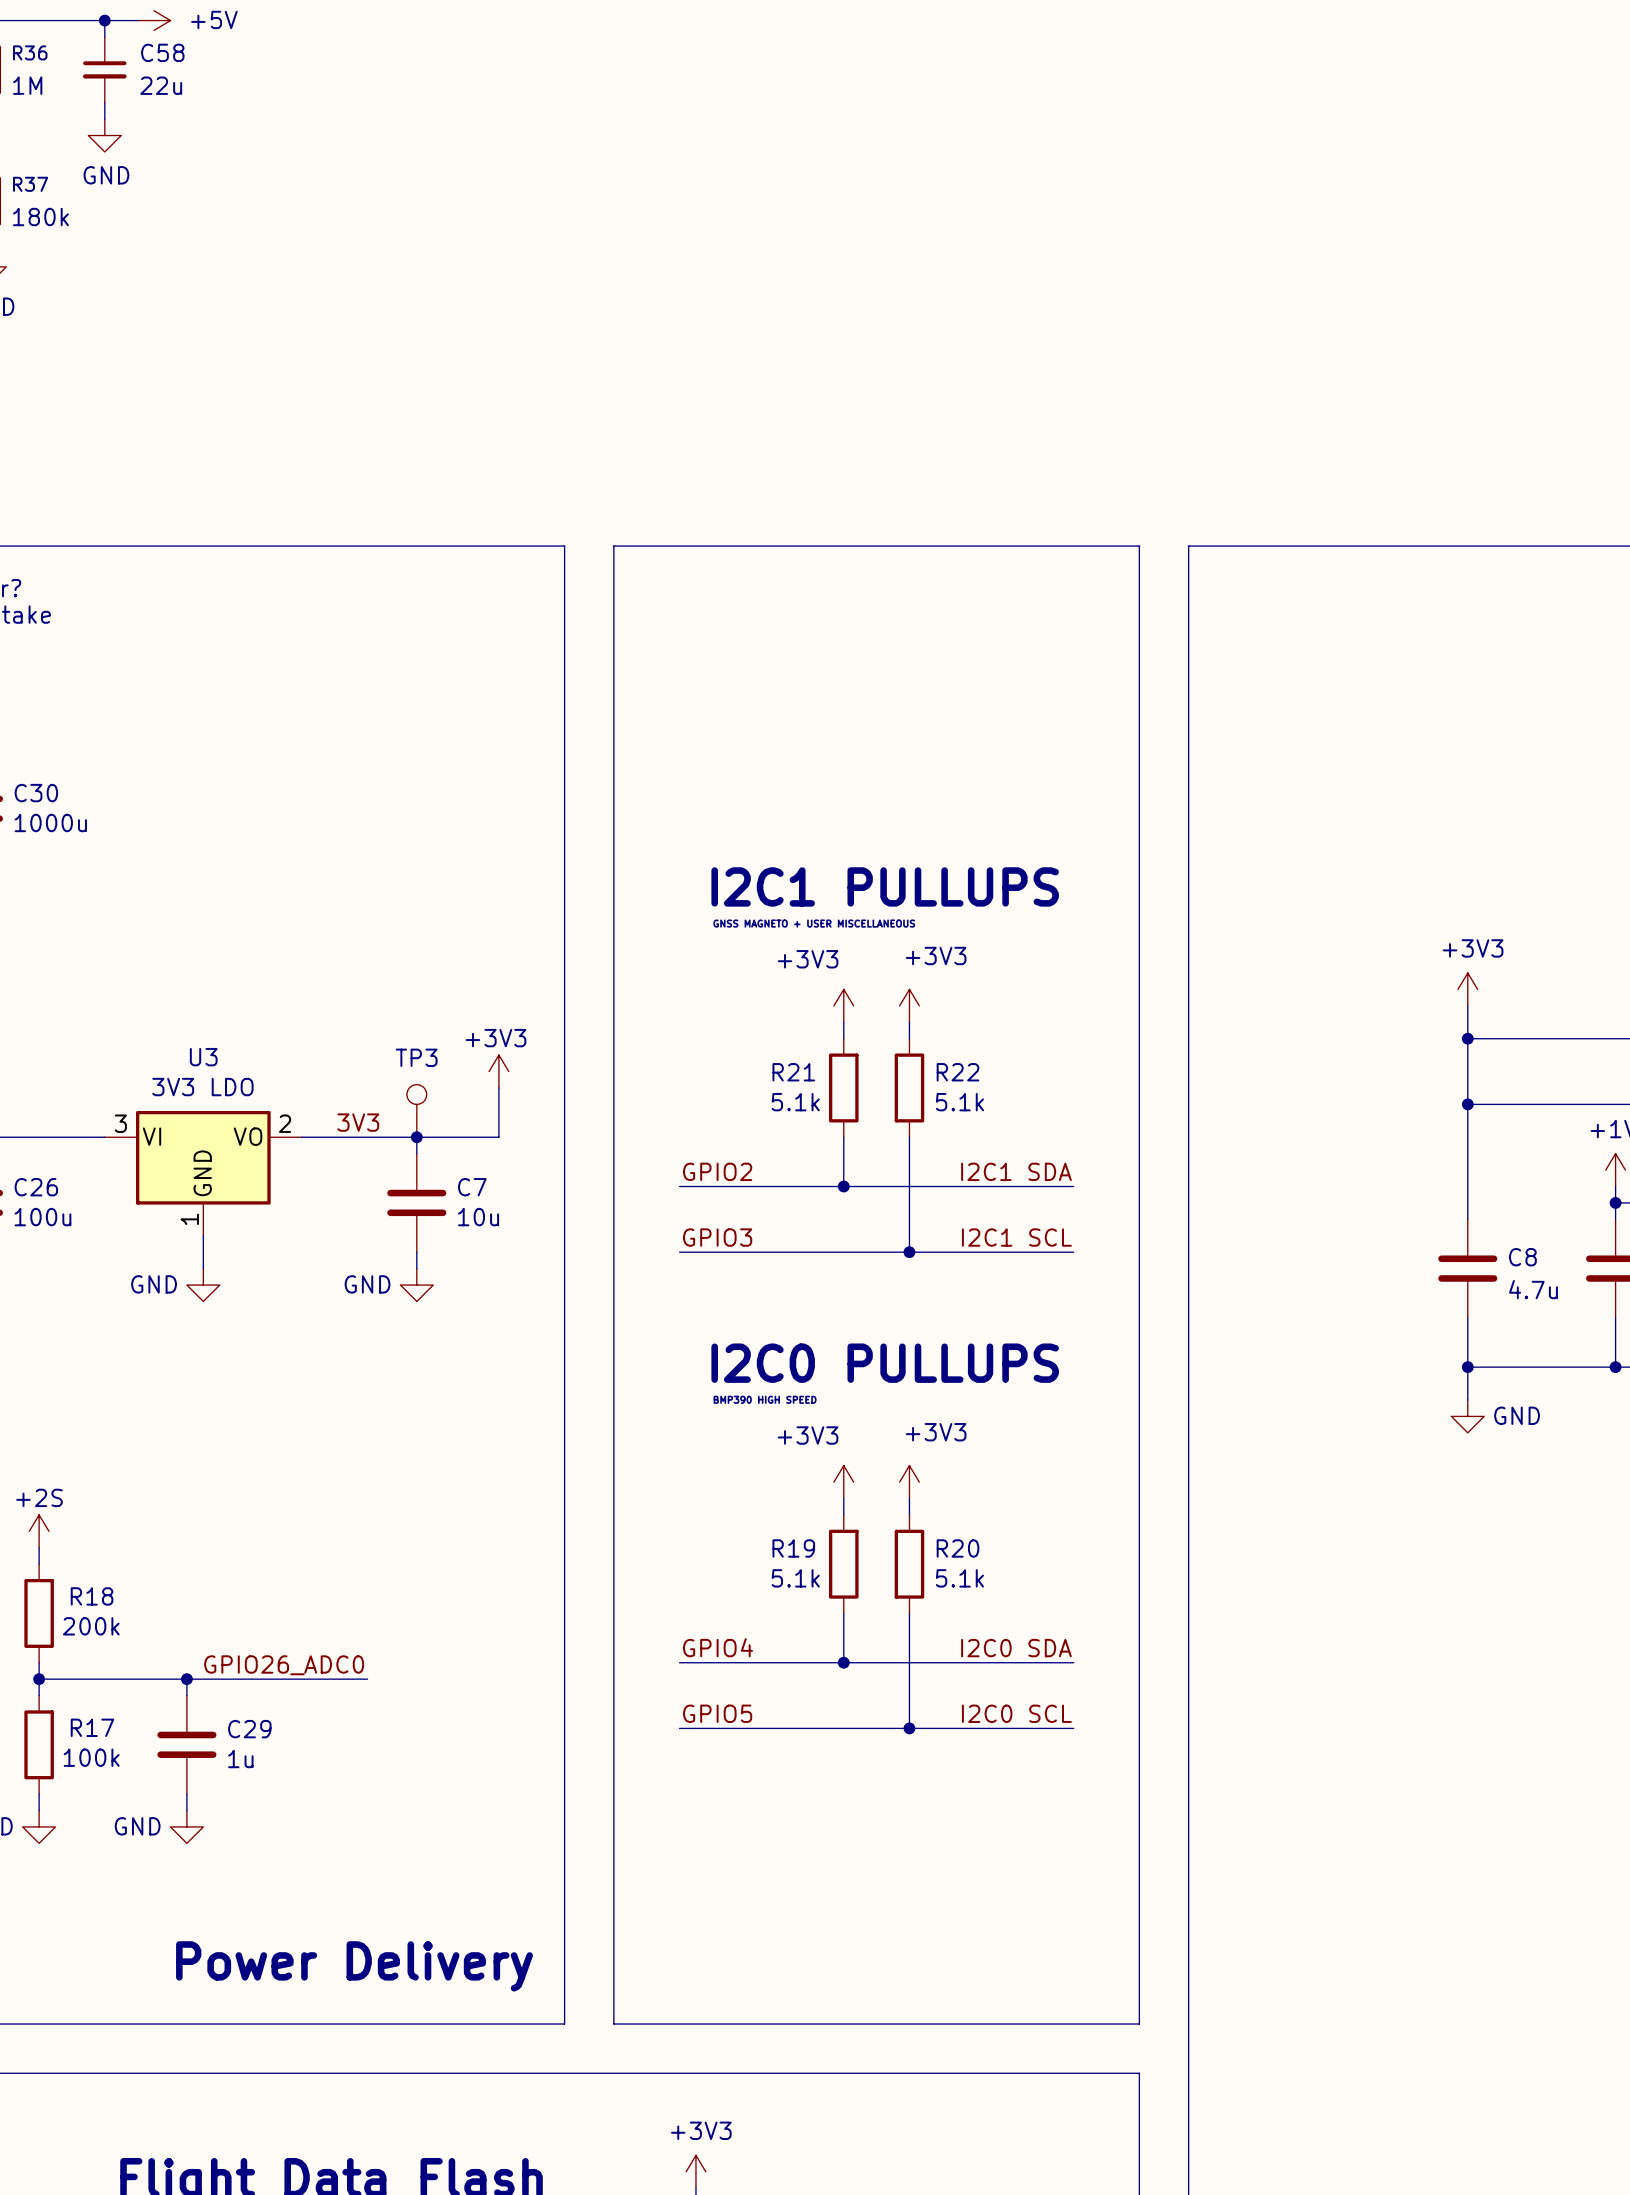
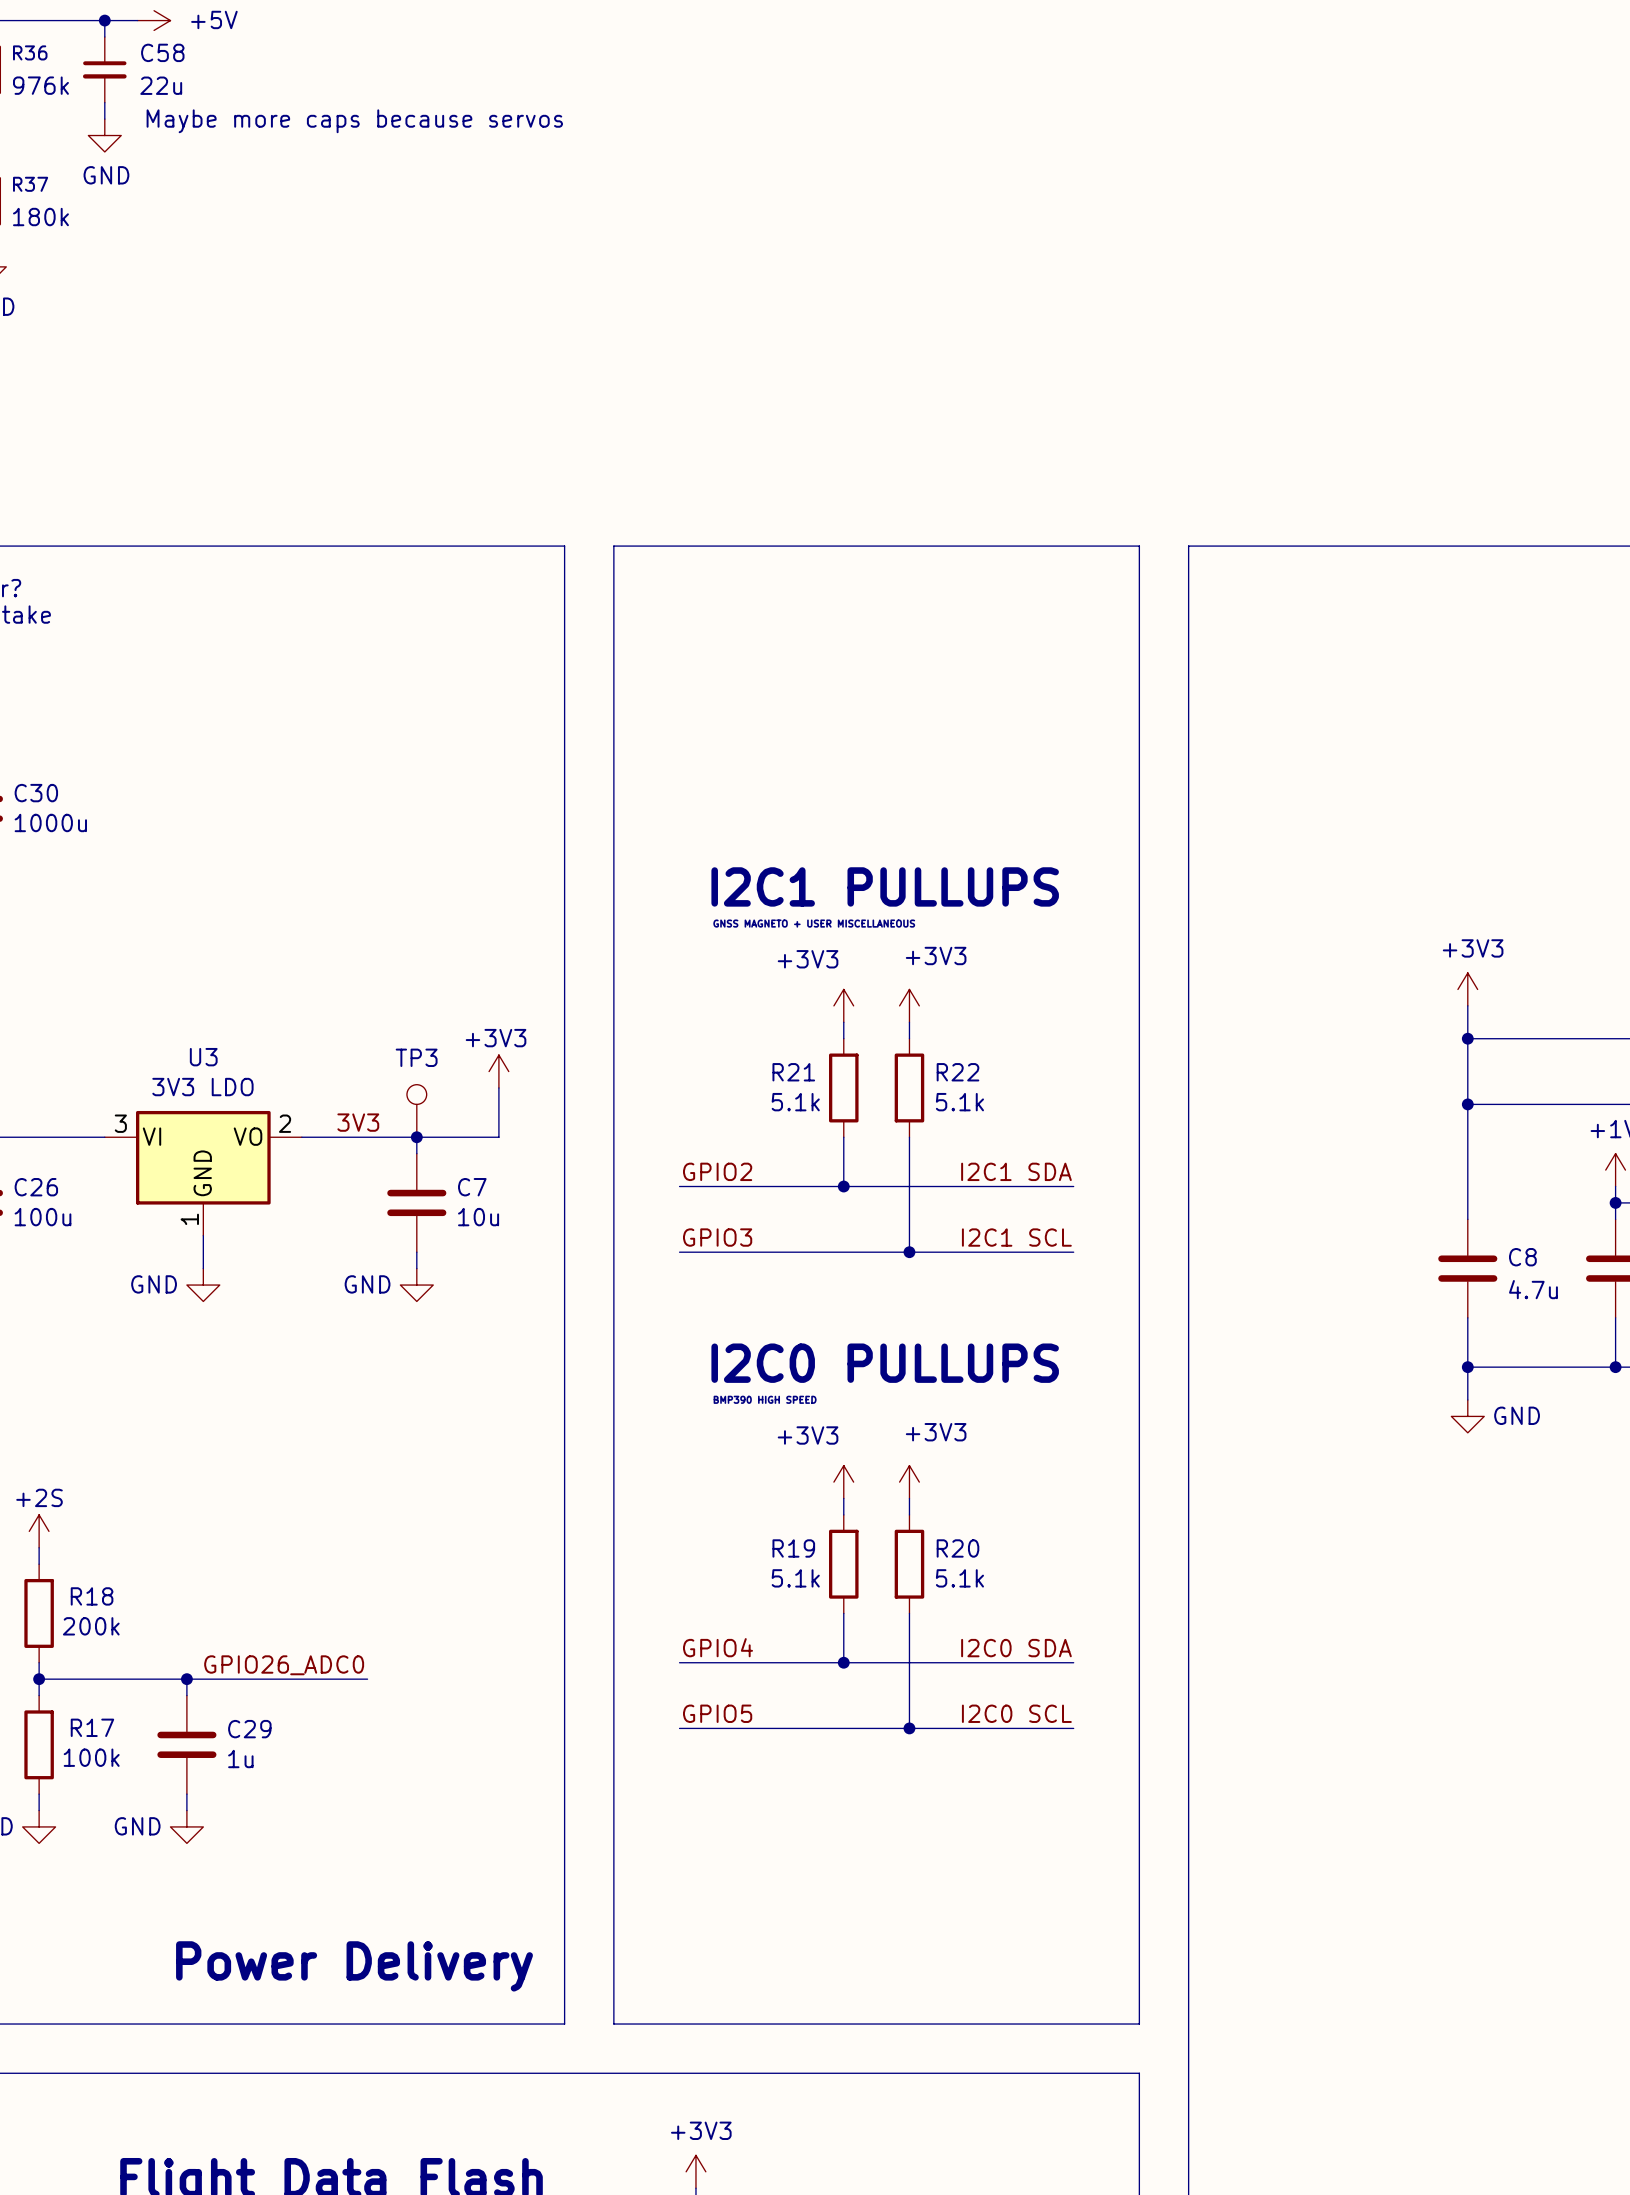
R36 value: 1M (27, 85) -> 976k (40, 85)
text: none -> Maybe more caps because servos (354, 121)

